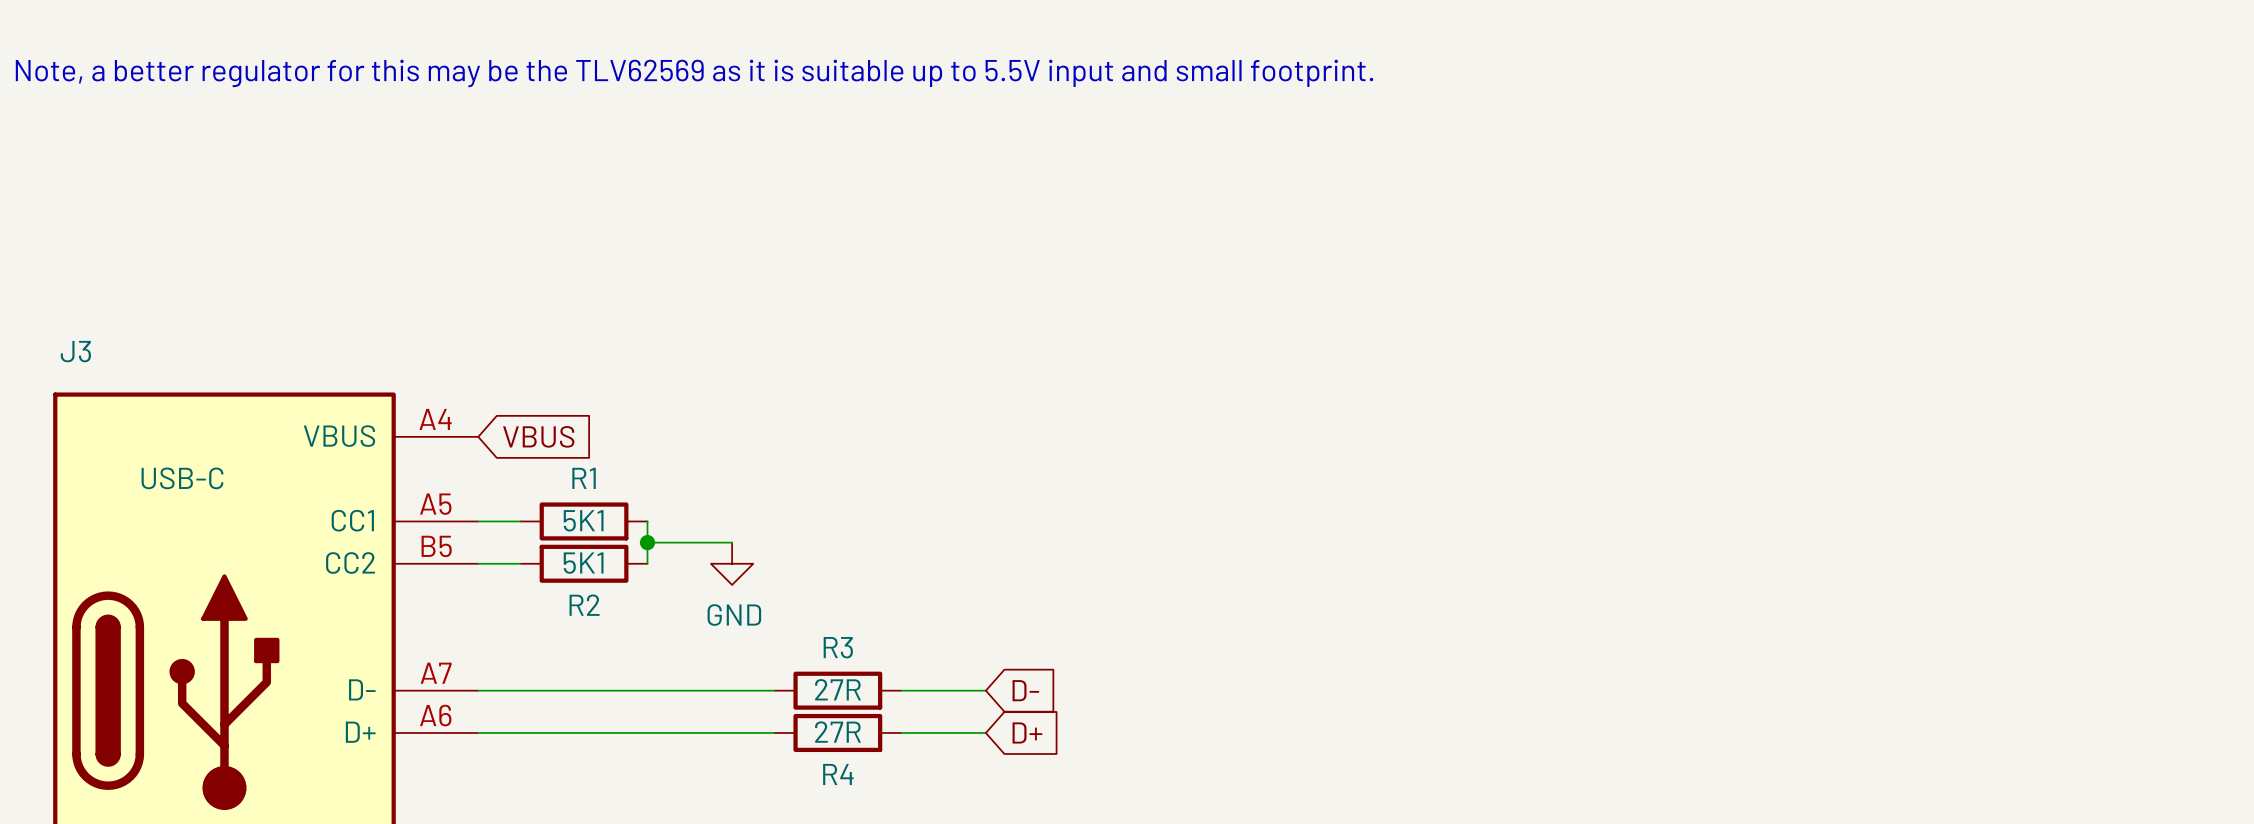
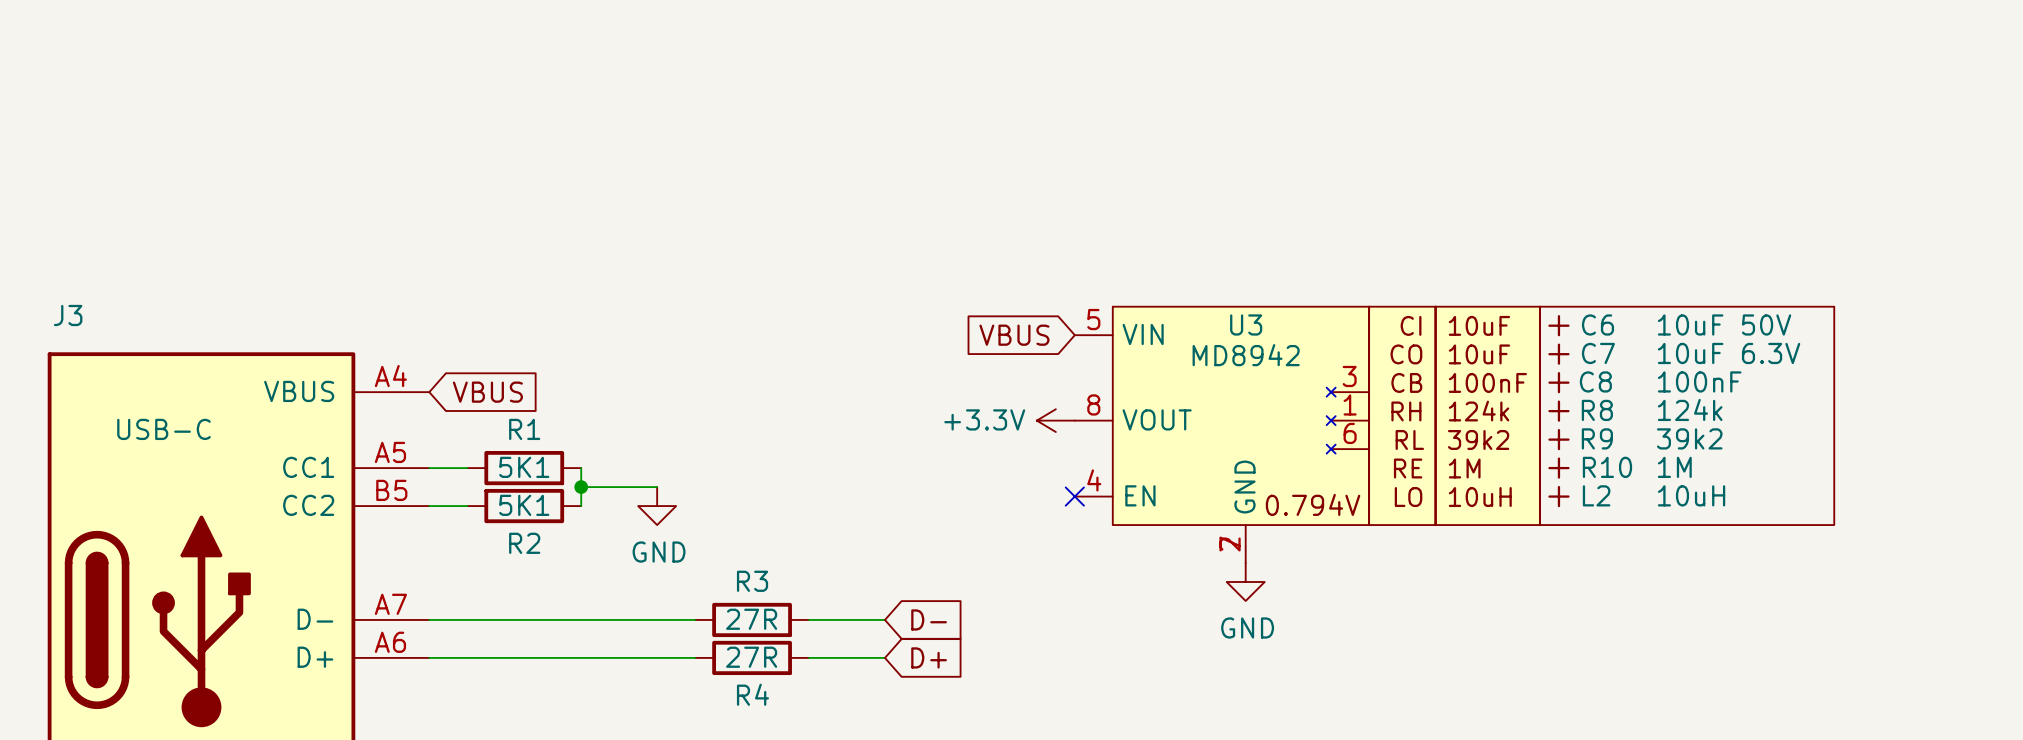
text: Note, a better regulator for this may be the TLV62569 as it is suitable up to 5.5V input and small footprint. (694, 73) -> none
C6: none -> 10uF 50V (1558, 325)
global label: none -> VBUS (1014, 335)
C7: none -> 10uF 6.3V (1558, 354)
C8: none -> 100nF (1558, 382)
R8: none -> 124k (1558, 411)
power symbol: none -> +3.3V (1055, 420)
U3: none -> MD8942 (1454, 434)
R9: none -> 39k2 (1558, 439)
R10: none -> 1M (1558, 468)
no-connect mark: none -> (1074, 496)
L2: none -> 10uH (1558, 496)
power symbol: none -> GND (1245, 582)

